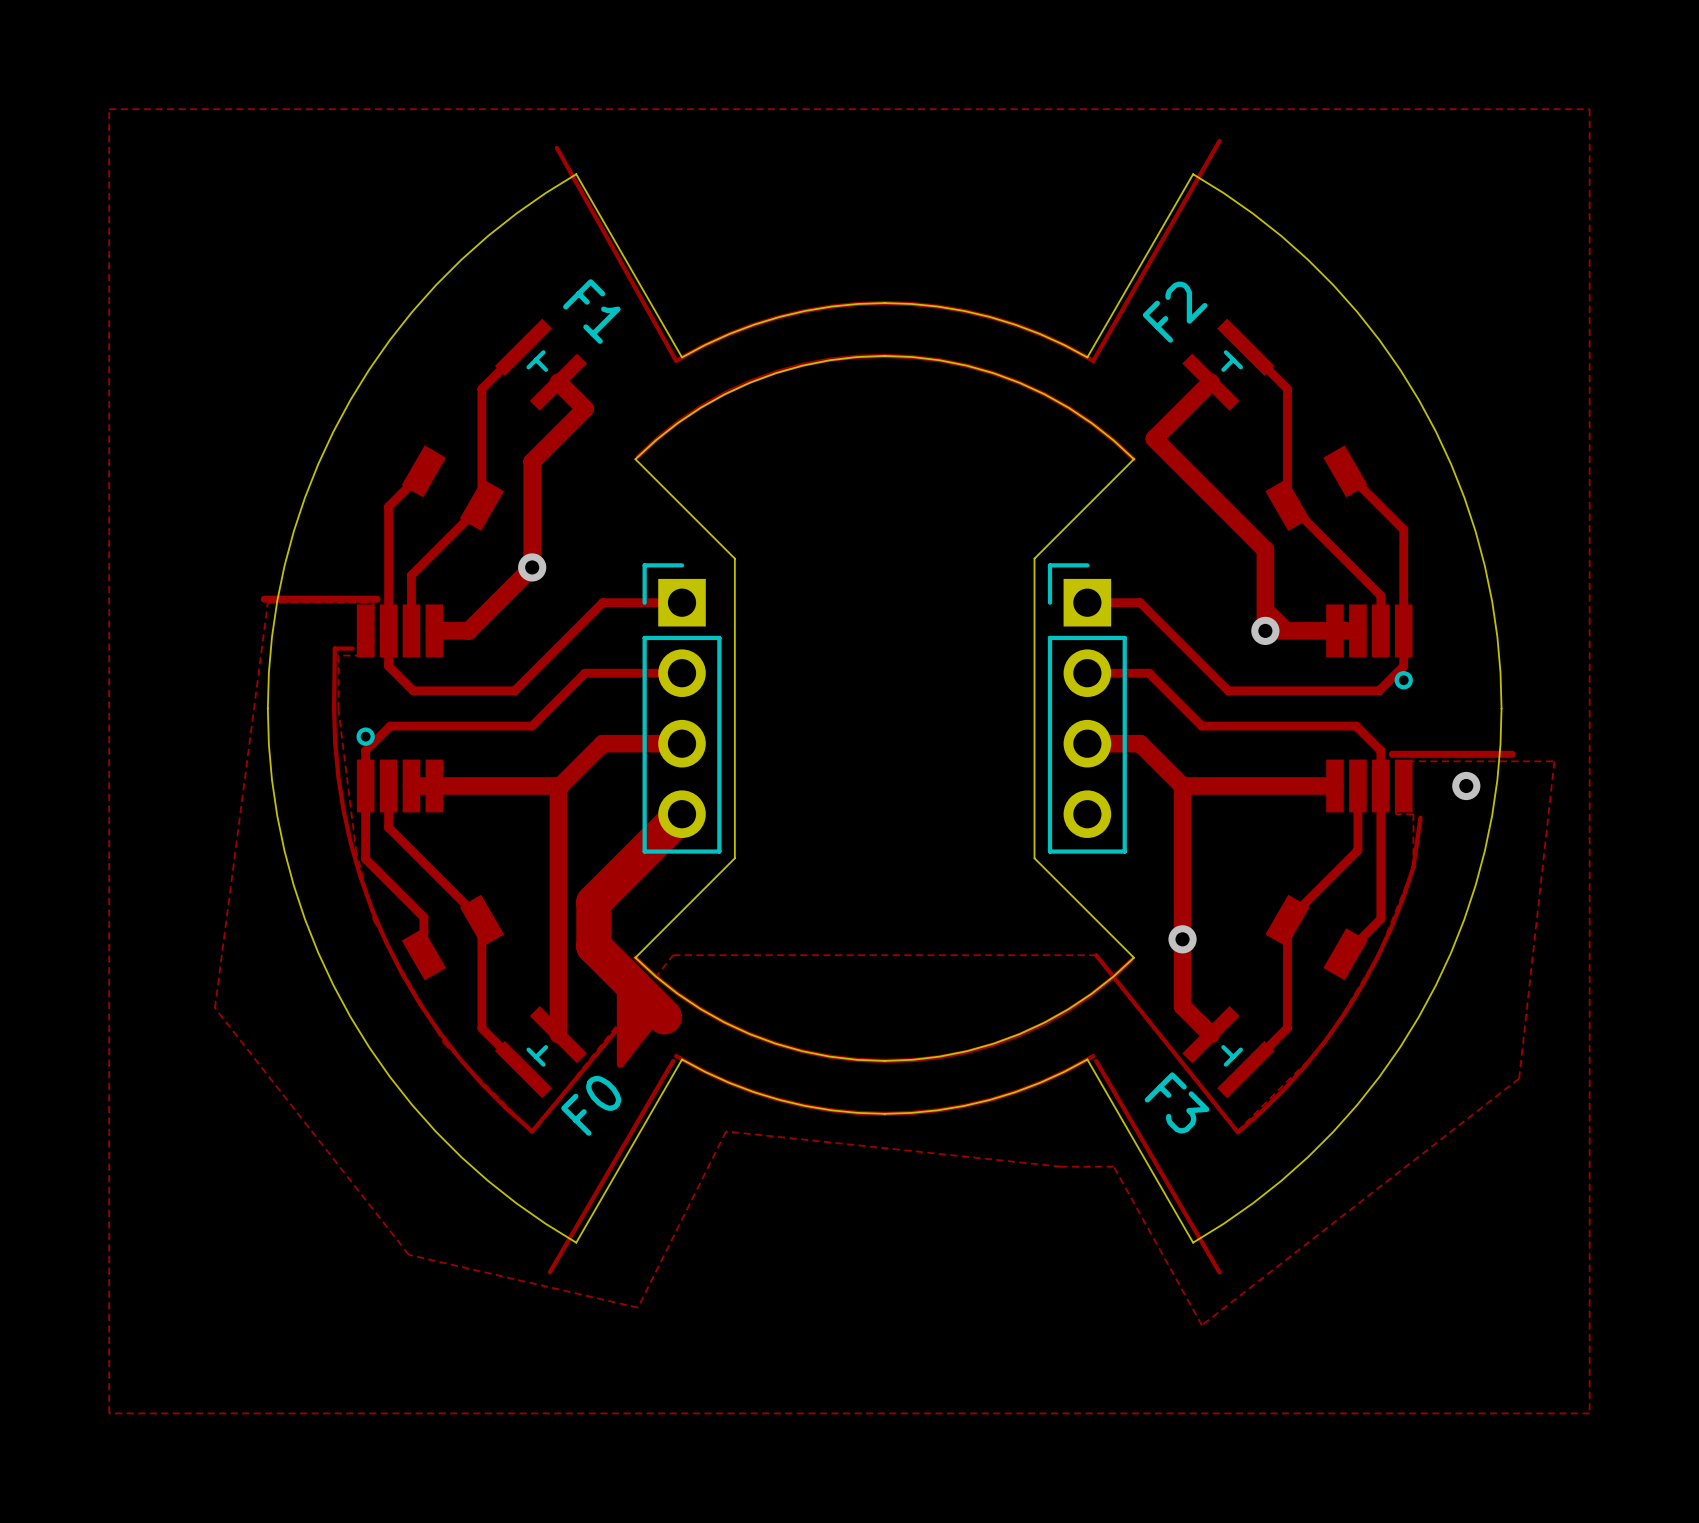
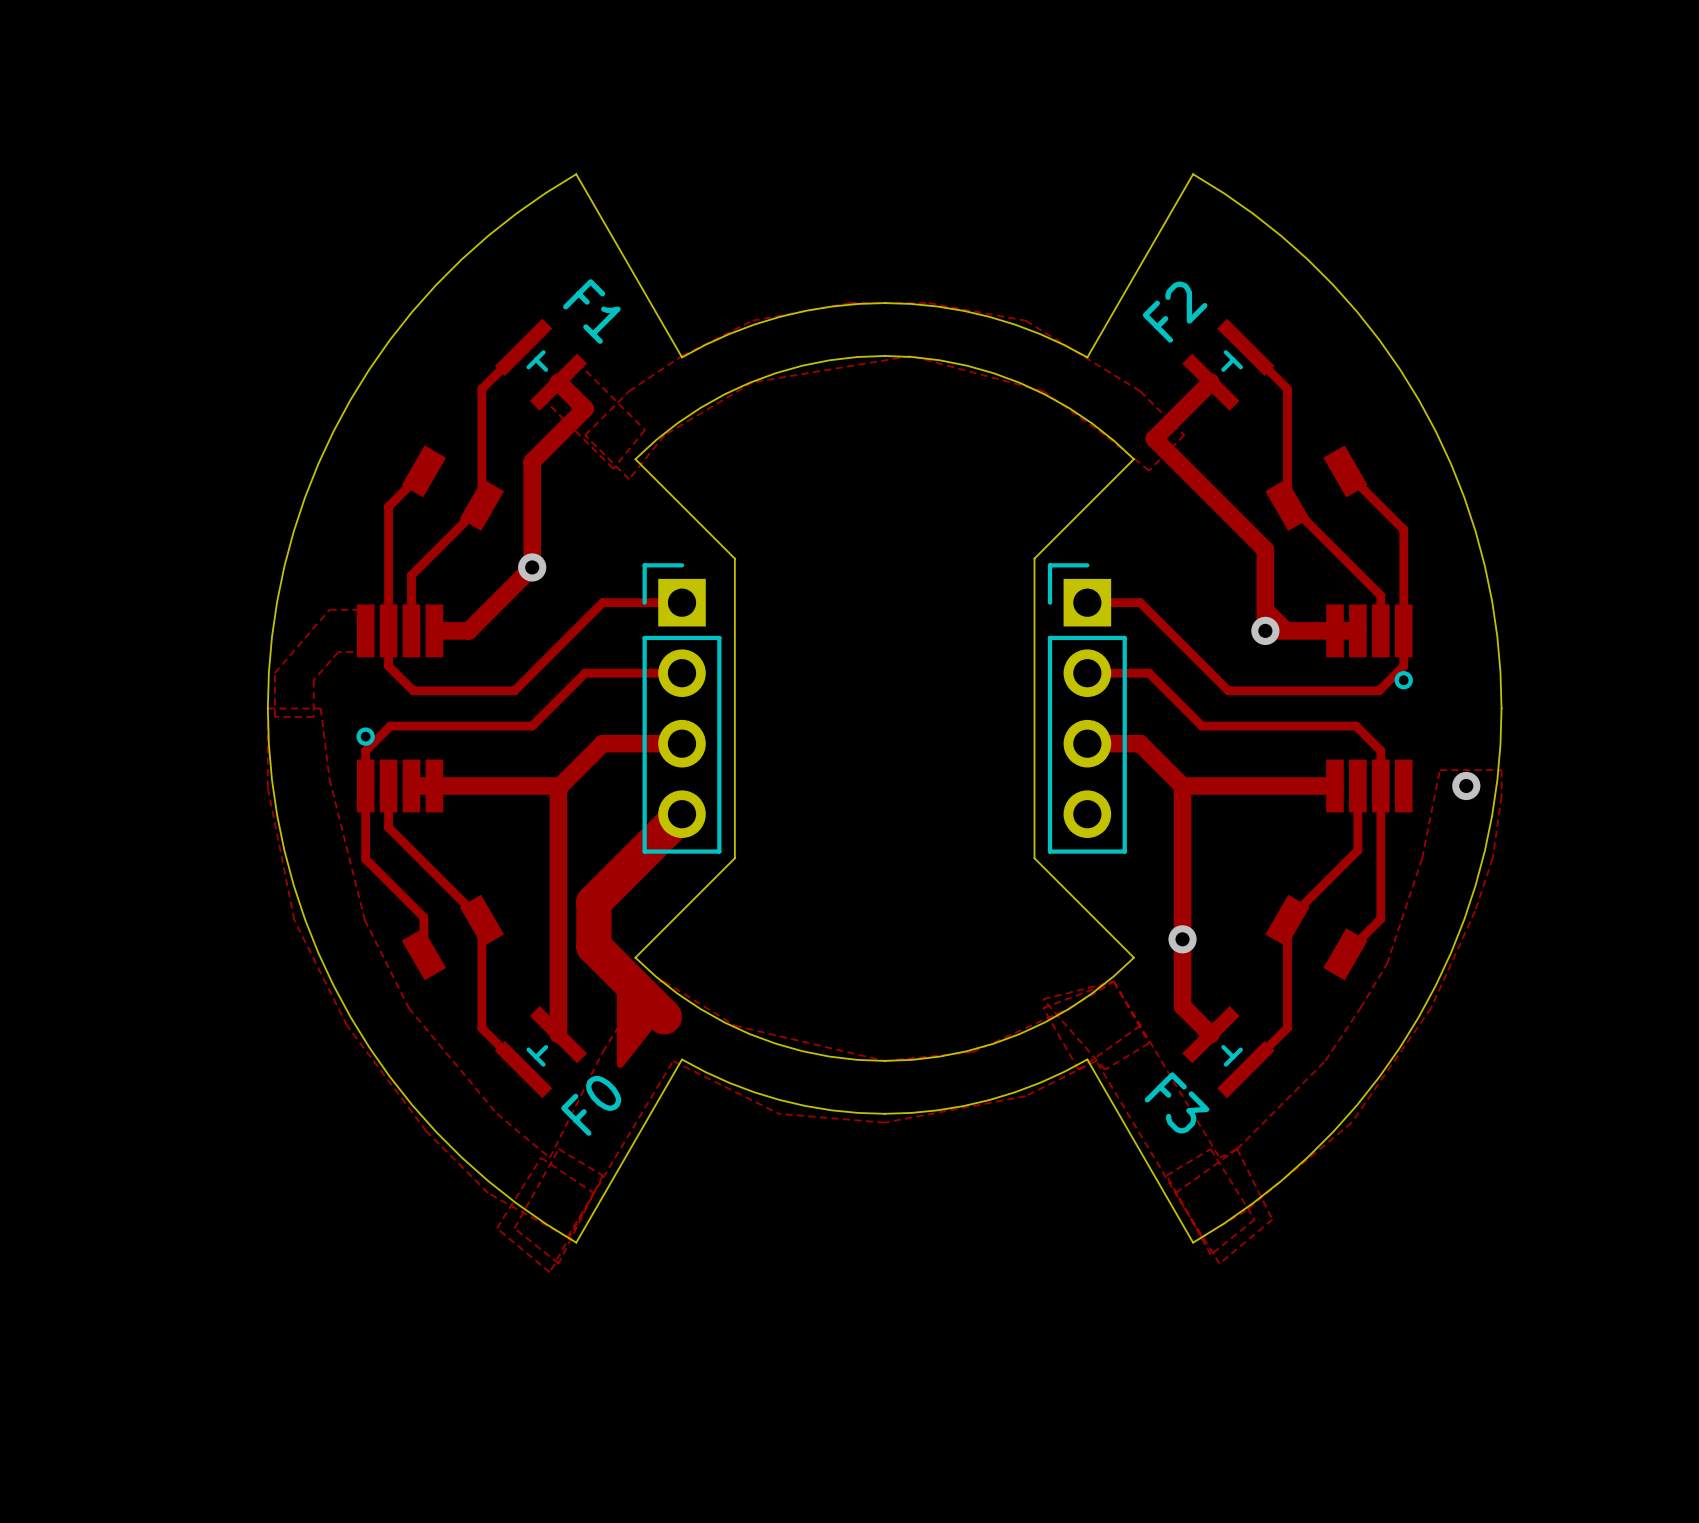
zone outline: (109, 109) (109, 1413) (1589, 1413) (1589, 109) (109, 109) -> none
track: (1219, 140) (1093, 360) (1044, 335) (992, 317) (939, 306) (884, 303) (830, 306) (776, 317) (724, 335) (676, 360) (556, 147) -> none
zone outline: none -> (849, 303) (752, 320) (682, 355) (629, 391) (585, 435) (629, 479) (664, 435) (752, 382) (911, 355) (1043, 391) (1104, 435) (1149, 470) (1184, 435) (1140, 391) (1025, 320) (928, 303) (849, 303)
zone outline: none -> (578, 363) (542, 398) (613, 468) (644, 429) (578, 363)
track: (637, 456) (658, 438) (702, 405) (751, 381) (803, 364) (830, 359) (884, 355) (912, 357) (966, 365) (1019, 382) (1068, 407) (1091, 423) (1133, 459) -> none
track: (264, 599) (377, 599) -> none
zone outline: (267, 602) (214, 1008) (408, 1254) (637, 1307) (726, 1131) (1060, 1166) (1113, 1166) (1201, 1325) (1519, 1078) (1554, 761) (1395, 761) (1395, 814) (1413, 814) (1413, 867) (1378, 955) (1325, 1043) (1237, 1131) (1096, 955) (673, 955) (532, 1131) (444, 1043) (373, 919) (355, 849) (338, 708) (338, 655) (373, 655) (373, 602) (267, 602) -> none
zone outline: none -> (329, 609) (274, 673) (274, 716) (313, 716) (313, 680) (338, 652) (364, 652) (364, 609) (329, 609)
track: (352, 648) (334, 648) (334, 708) (338, 777) (351, 844) (360, 877) (386, 941) (401, 972) (438, 1030) (482, 1084) (532, 1131) (620, 1025) -> none
track: (1392, 754) (1512, 754) -> none
track: (1420, 817) (1413, 867) (1403, 897) (1377, 956) (1362, 985) (1345, 1012) (1306, 1064) (1262, 1111) (1238, 1132) -> none
track: (1096, 955) (1237, 1131) -> none
track: (635, 957) (677, 993) (700, 1008) (749, 1034) (802, 1051) (857, 1059) (884, 1060) (939, 1057) (966, 1052) (1018, 1035) (1067, 1010) (1089, 995) (1131, 960) -> none
zone outline: none -> (1113, 981) (1069, 1008) (972, 1052) (884, 1060) (734, 1025) (664, 981) (646, 981) (602, 1052) (549, 1157) (496, 1113) (408, 1008) (364, 919) (329, 778) (320, 708) (267, 708) (267, 787) (294, 919) (347, 1025) (426, 1131) (488, 1193) (567, 1237) (673, 1060) (778, 1113) (884, 1122) (1025, 1096) (1096, 1060) (1201, 1237) (1245, 1210) (1351, 1122) (1431, 1008) (1475, 911) (1492, 858) (1501, 796) (1501, 770) (1439, 770) (1422, 858) (1386, 964) (1325, 1060) (1237, 1149)
zone outline: none -> (1113, 981) (1219, 1157) (1237, 1149)
zone outline: none -> (1113, 981) (1043, 999) (1104, 1069) (1149, 1043) (1113, 981)
zone outline: none -> (1113, 981) (1043, 1008) (1078, 1069) (1140, 1025)
track: (676, 1056) (724, 1080) (776, 1099) (830, 1110) (884, 1113) (939, 1110) (992, 1099) (1044, 1080) (1093, 1056) -> none
track: (673, 1060) (549, 1272) -> none
track: (1096, 1060) (1219, 1272) -> none
zone outline: none -> (558, 1149) (514, 1228) (558, 1263) (602, 1175) (558, 1149)
zone outline: none -> (1210, 1149) (1166, 1175) (1210, 1254) (1254, 1219) (1210, 1149)
zone outline: none -> (1237, 1149) (1175, 1193) (1219, 1263) (1272, 1219) (1237, 1149)
zone outline: none -> (541, 1157) (496, 1228) (549, 1272) (593, 1193) (541, 1157)

